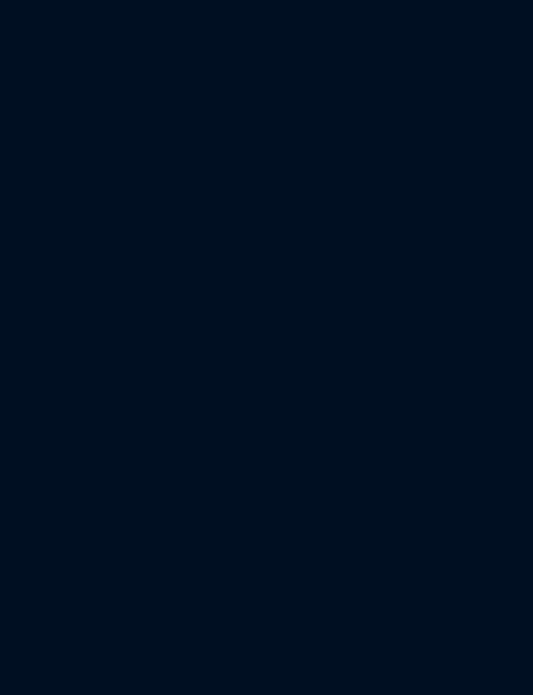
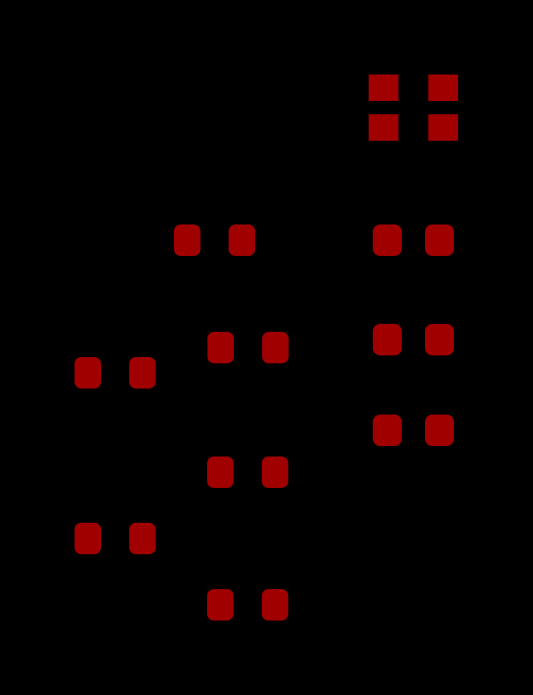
part: none -> (413, 107)
part: none -> (214, 240)
part: none -> (413, 240)
part: none -> (413, 339)
part: none -> (248, 347)
part: none -> (115, 372)
part: none -> (413, 430)
part: none -> (247, 472)
part: none -> (115, 538)
part: none -> (247, 604)

